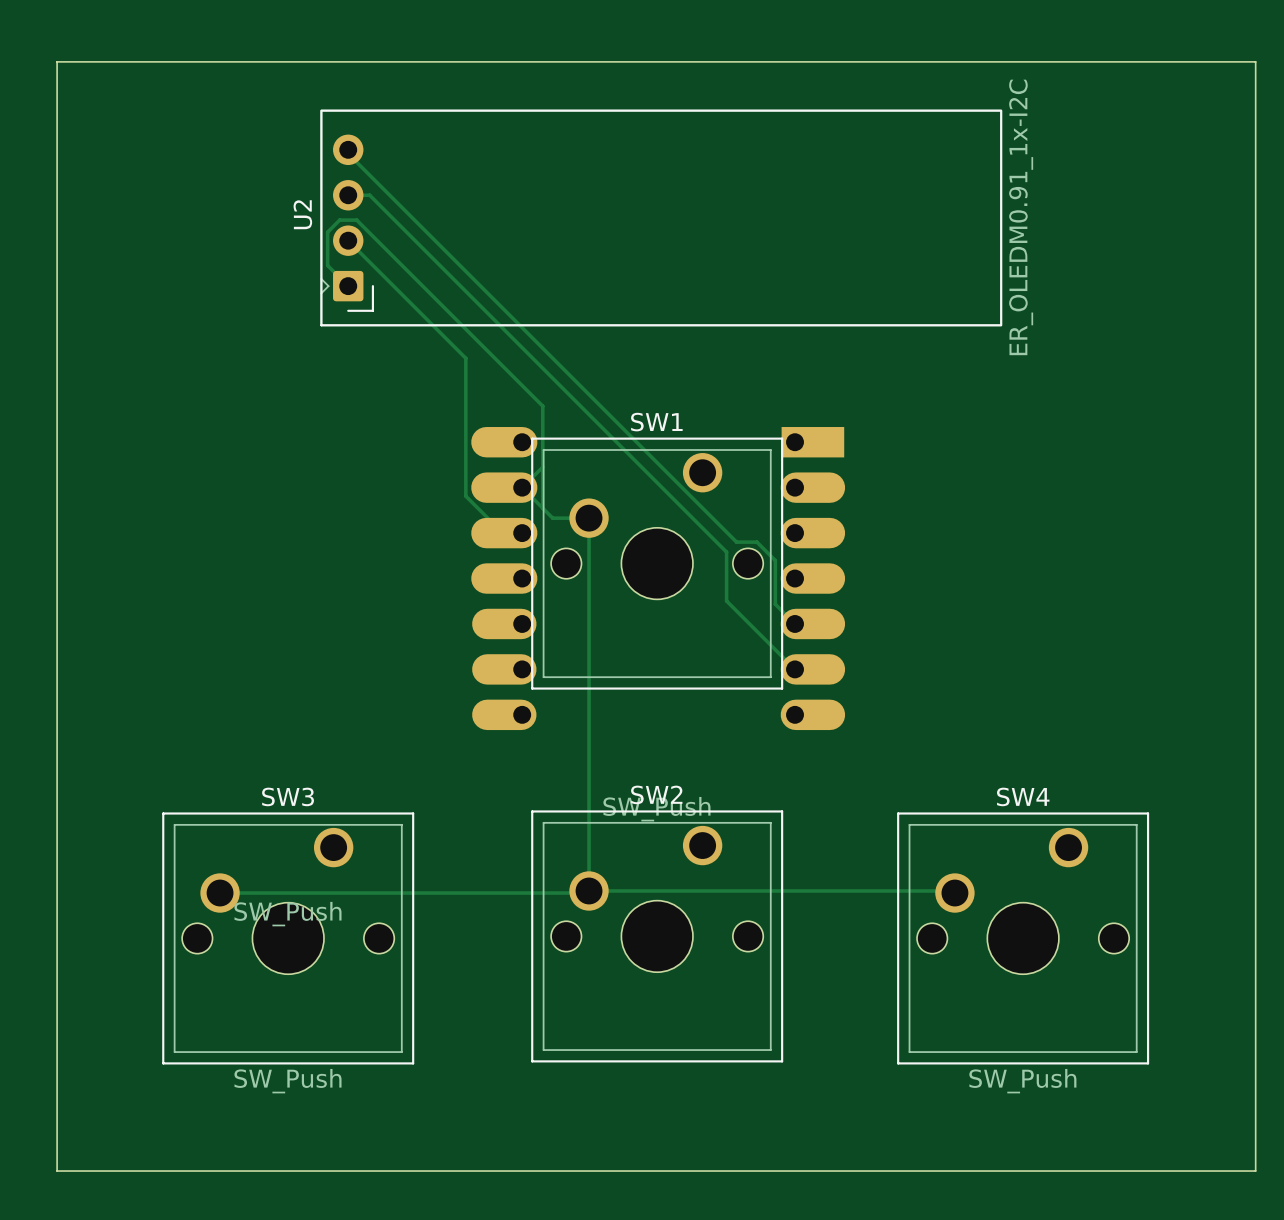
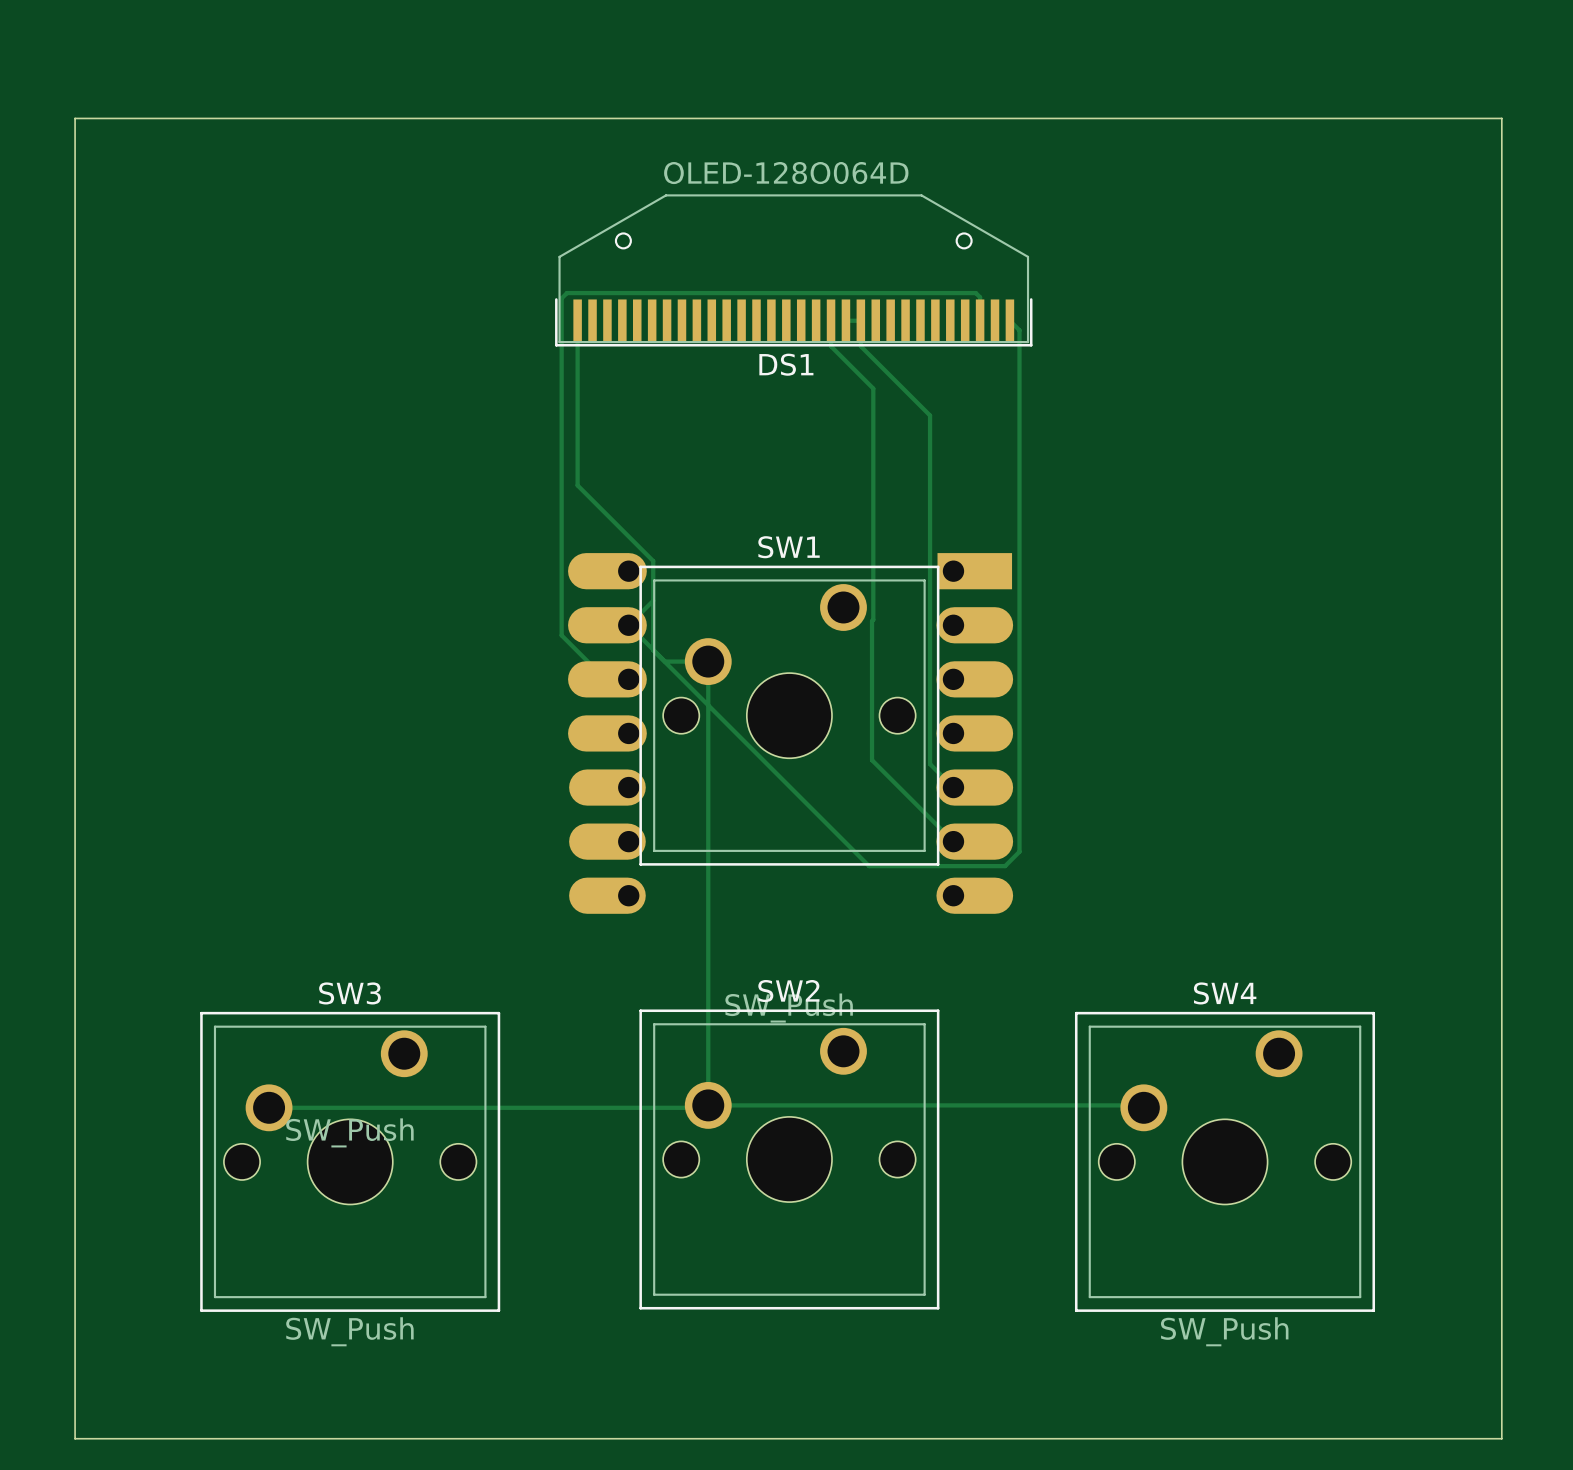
track: (348, 149) (348, 153) (736, 542) (756, 542) (775, 560) -> (845, 320) (860, 320) (860, 346) (930, 415) (930, 712)
DS1: none -> OLED-128O064D (793, 270)
track: (348, 195) (369, 195) (726, 552) -> (831, 320) (831, 346) (873, 388) (872, 701)
U2: ER_OLEDM0.91_1x-I2C (661, 217) -> none
track: none -> (1009, 320) (1019, 330) (1019, 851) (1005, 866) (869, 866) (653, 650)
track: (348, 240) (465, 358) -> (980, 320) (980, 297) (975, 293) (566, 293) (561, 298) (561, 471)
track: (348, 286) (327, 265) (327, 232) (339, 220) (356, 220) (542, 406) (542, 433) -> (577, 320) (577, 485) (653, 561)

